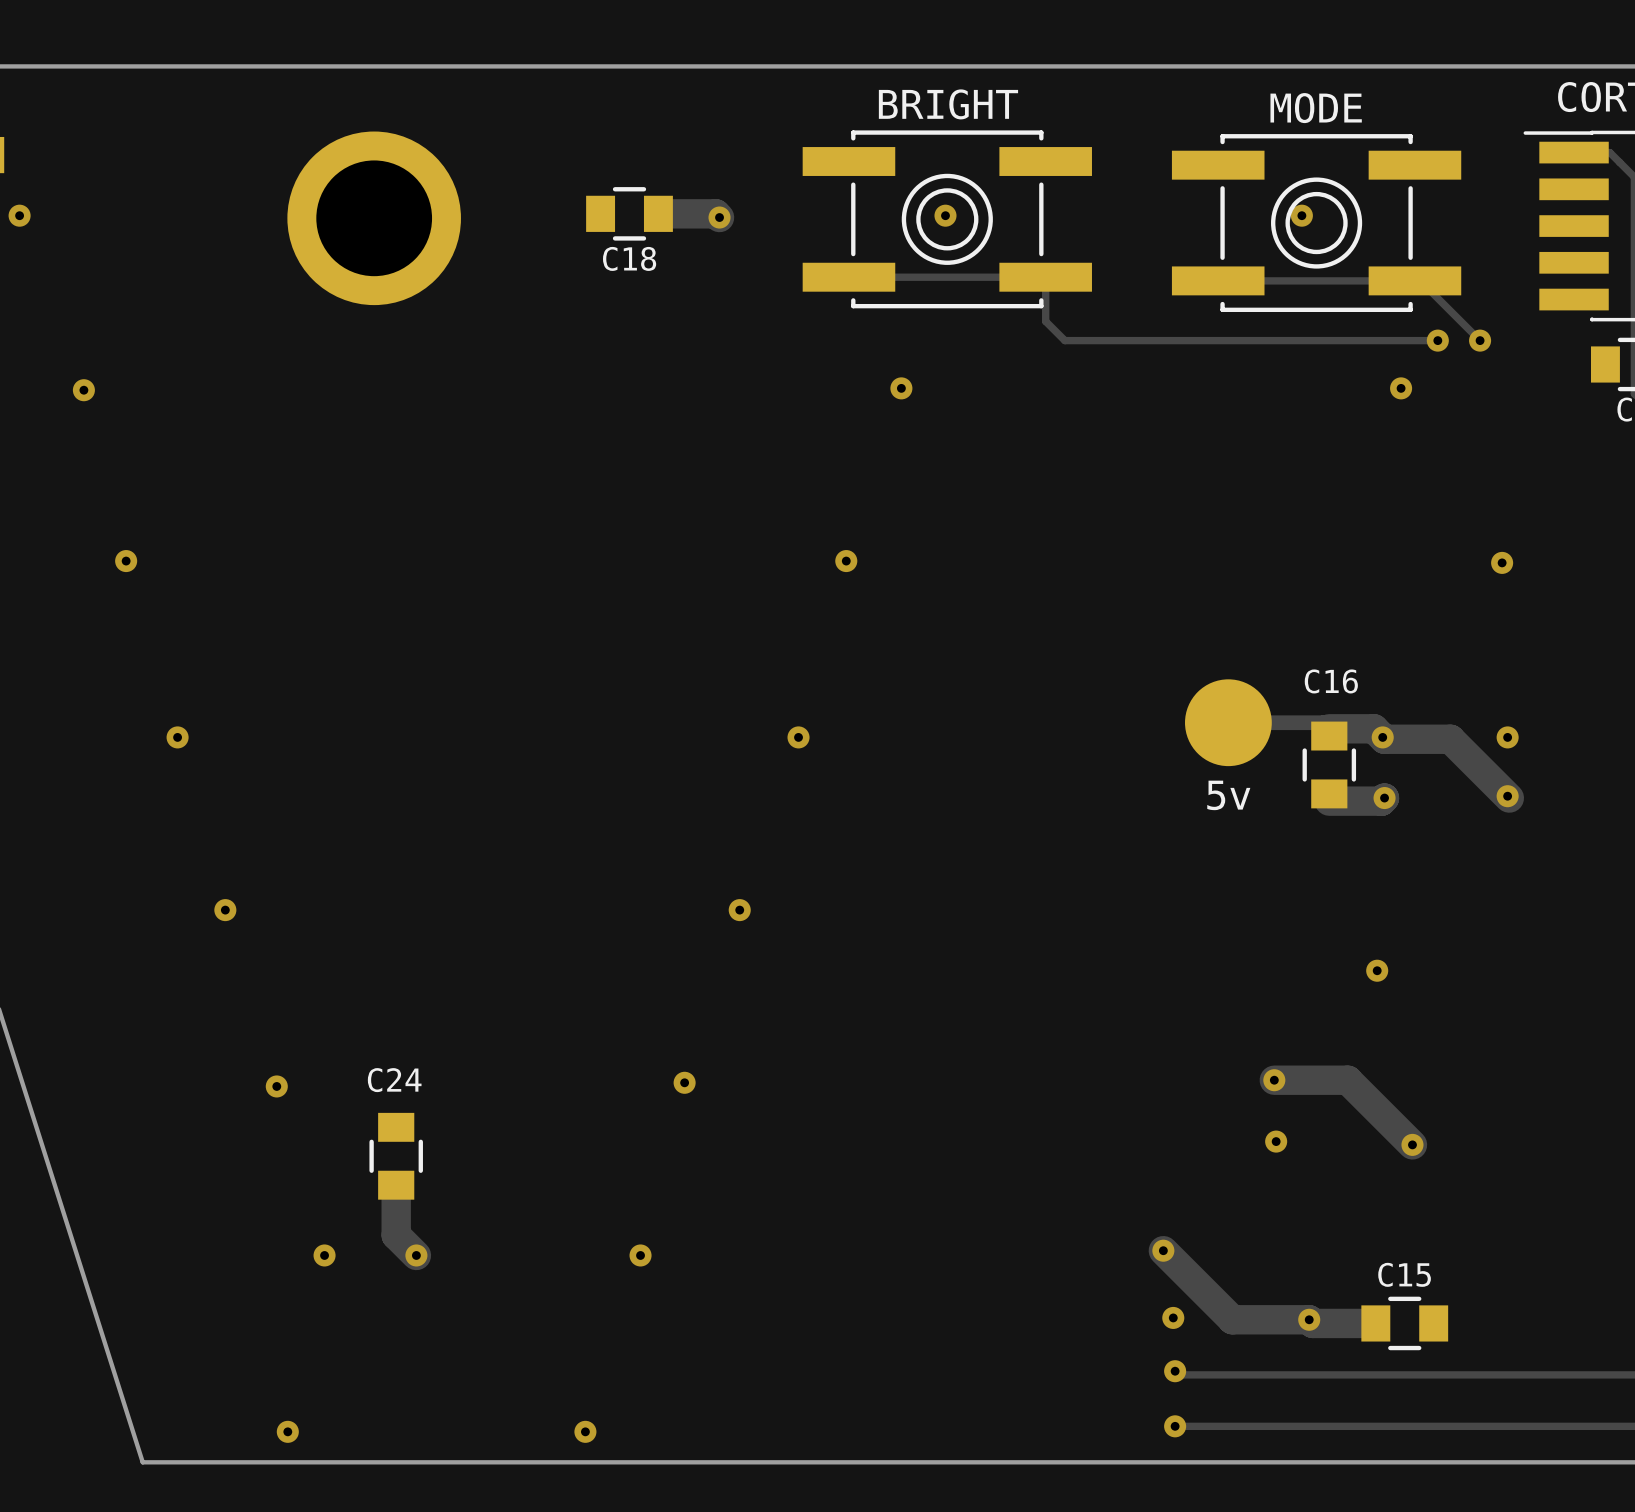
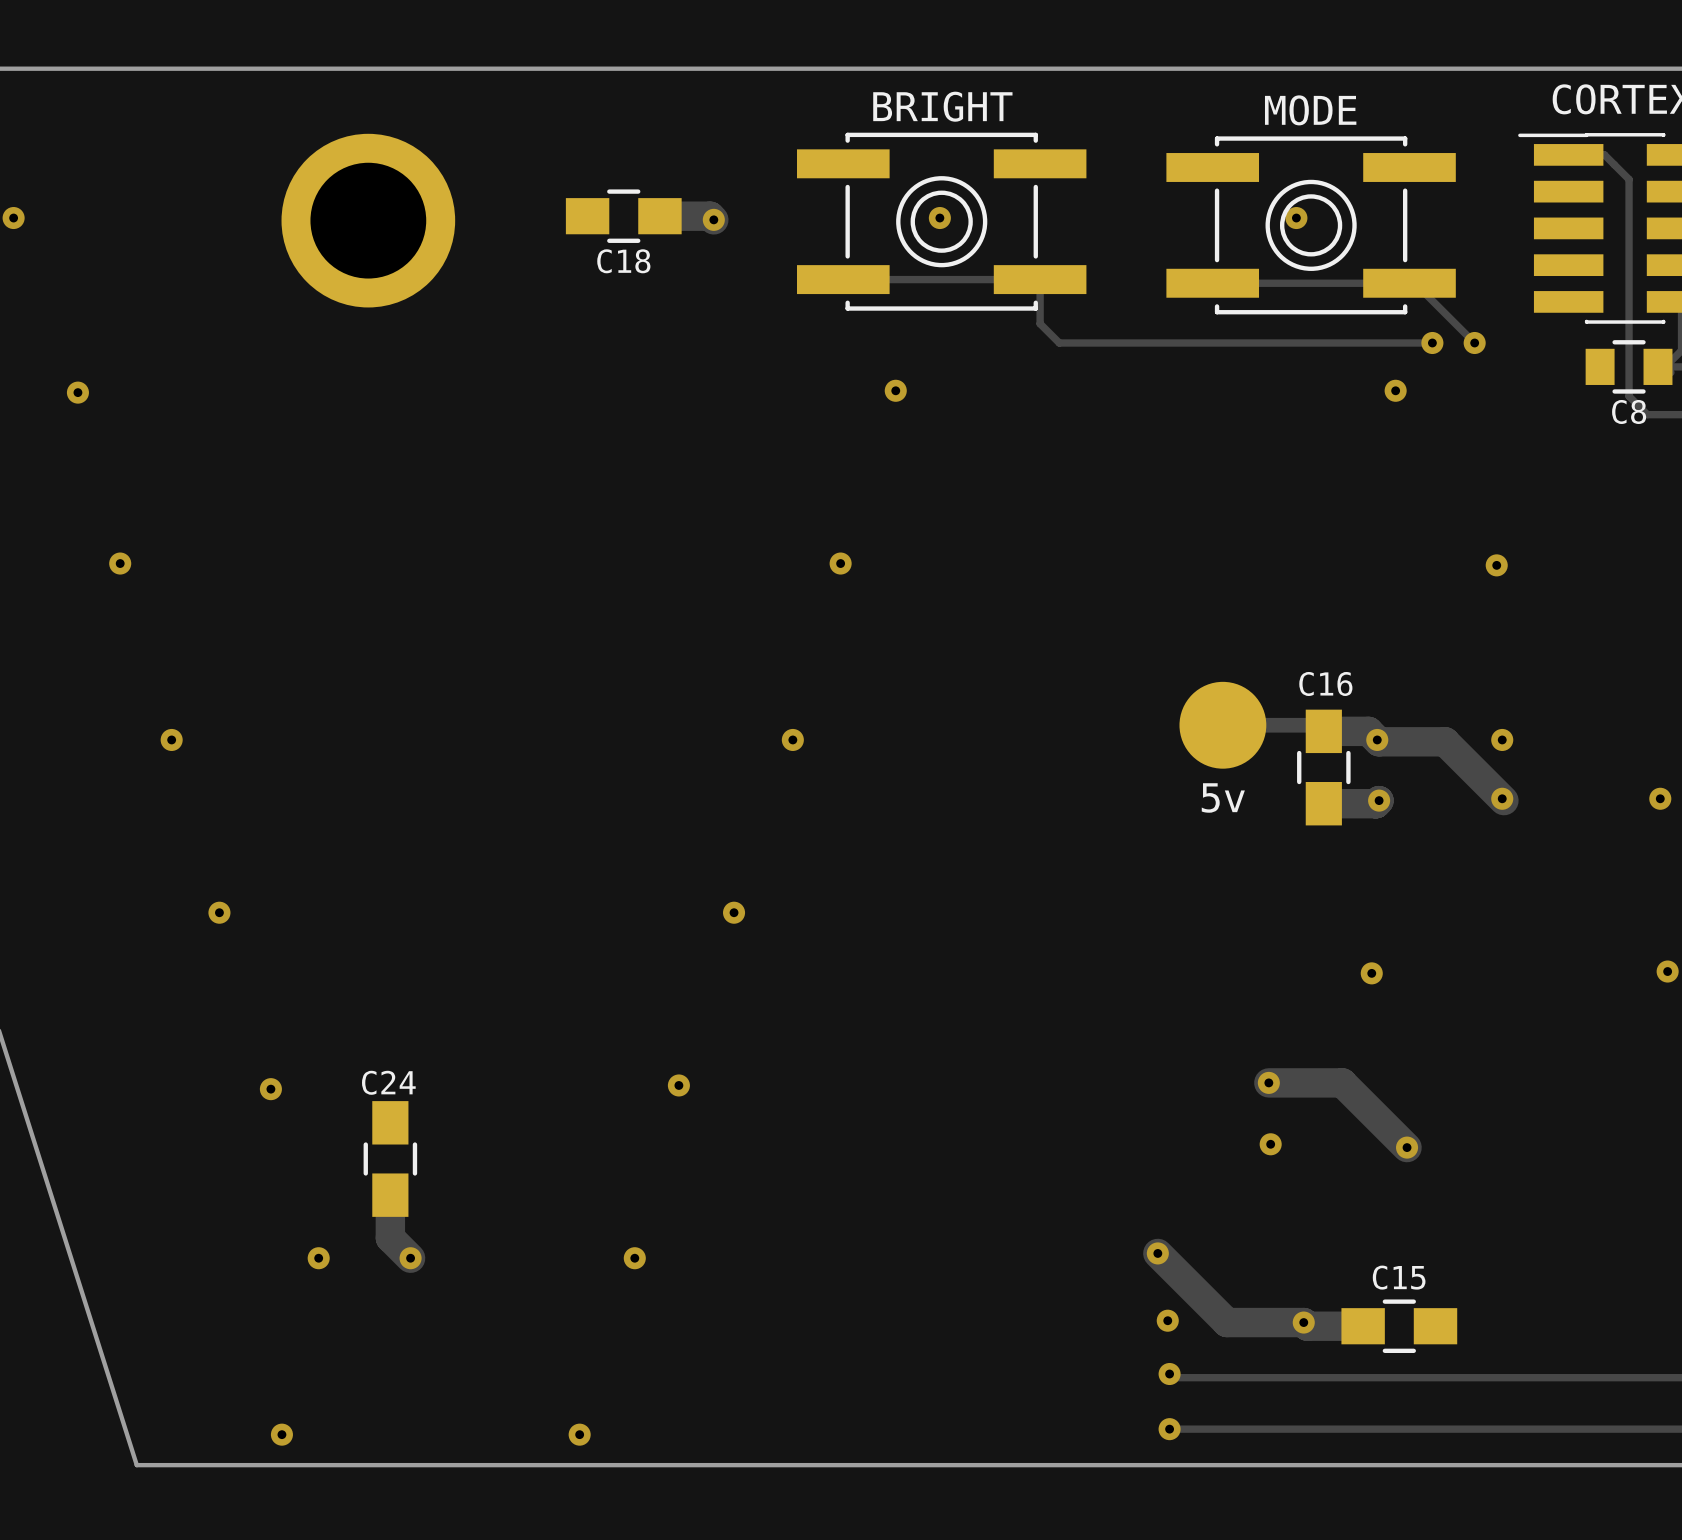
C18 footprint: [586, 187, 673, 241] -> [565, 189, 682, 243]
C16 footprint: [1302, 721, 1357, 809] -> [1297, 709, 1351, 826]
C24 footprint: [369, 1112, 423, 1200] -> [363, 1101, 418, 1217]
C15 footprint: [1361, 1296, 1449, 1351] -> [1341, 1299, 1458, 1353]

